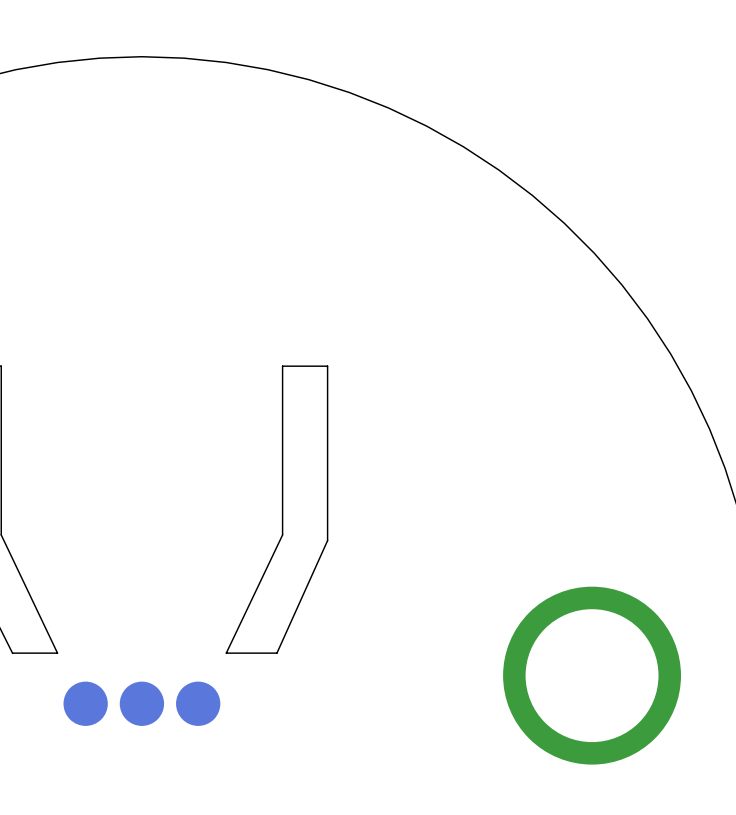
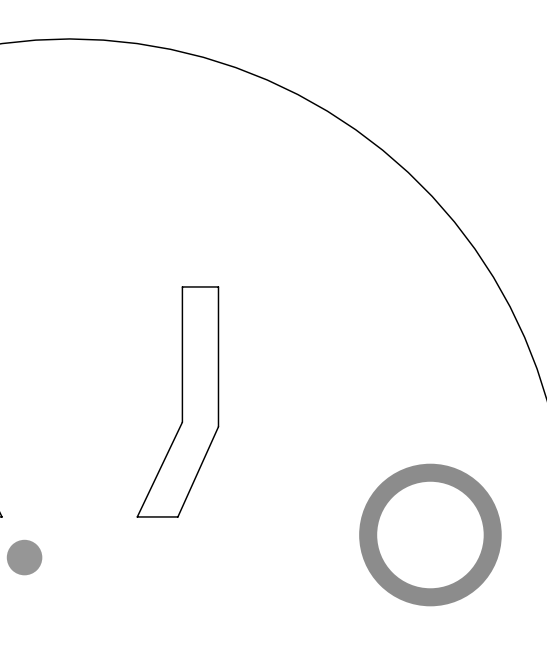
part: (141, 703) -> none
part: (198, 703) -> none

